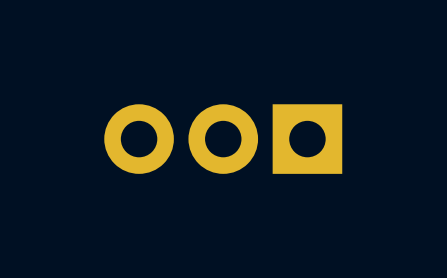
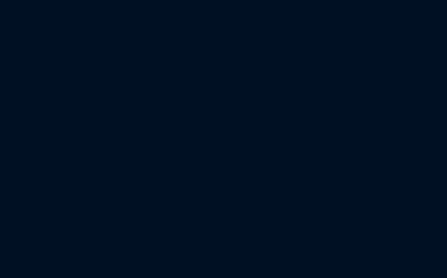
part: (223, 139) -> none

